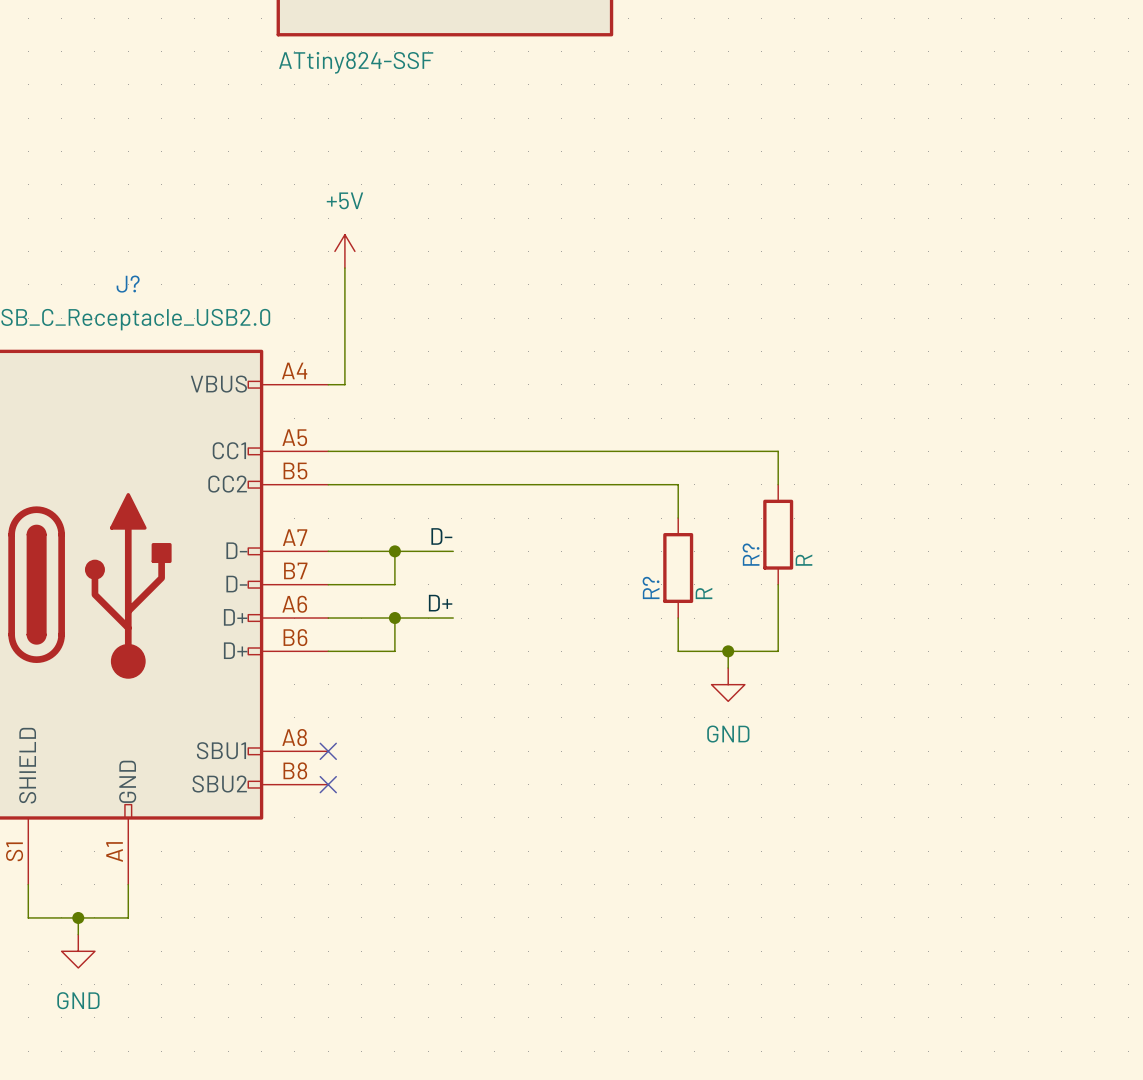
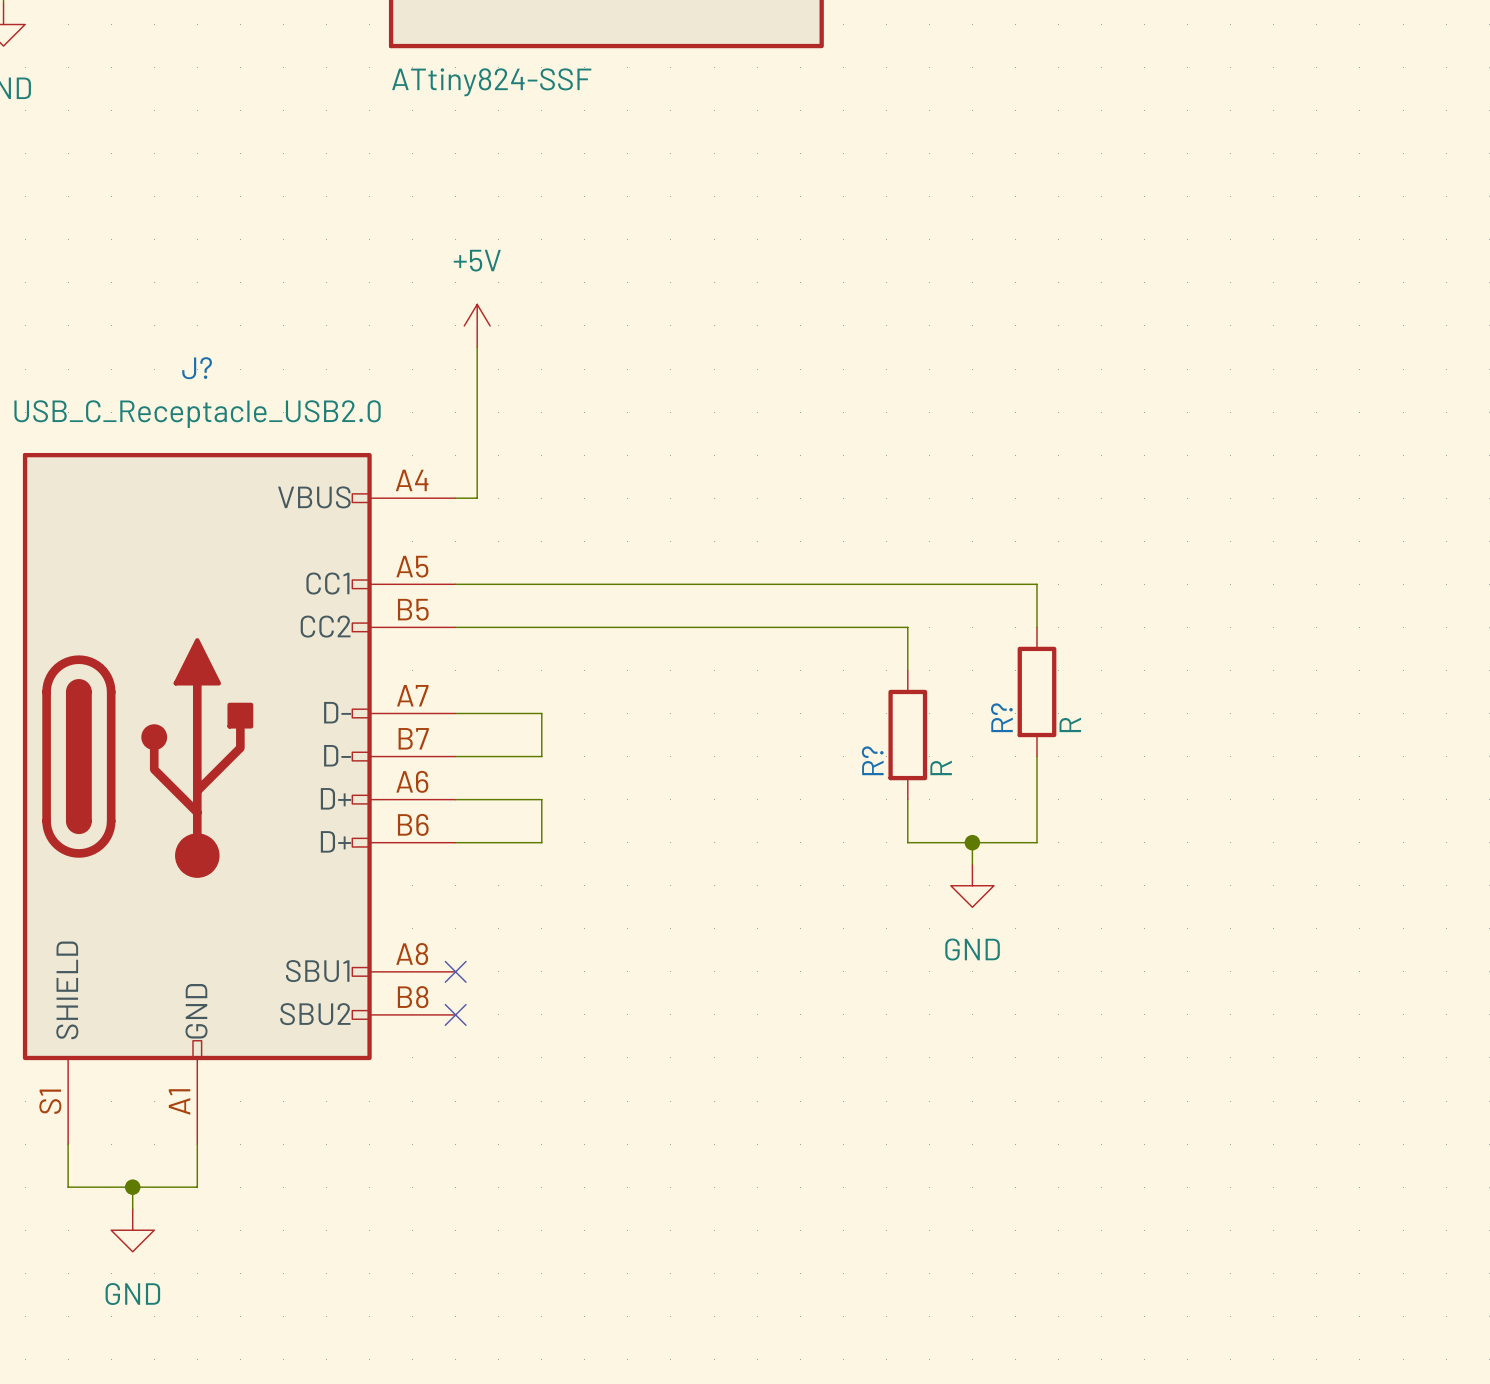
label: D- (441, 536) -> none
wire: (394, 551) (453, 551) -> none
junction: (394, 551) -> none
label: D+ (440, 603) -> none
wire: (394, 618) (453, 618) -> none
junction: (394, 618) -> none

